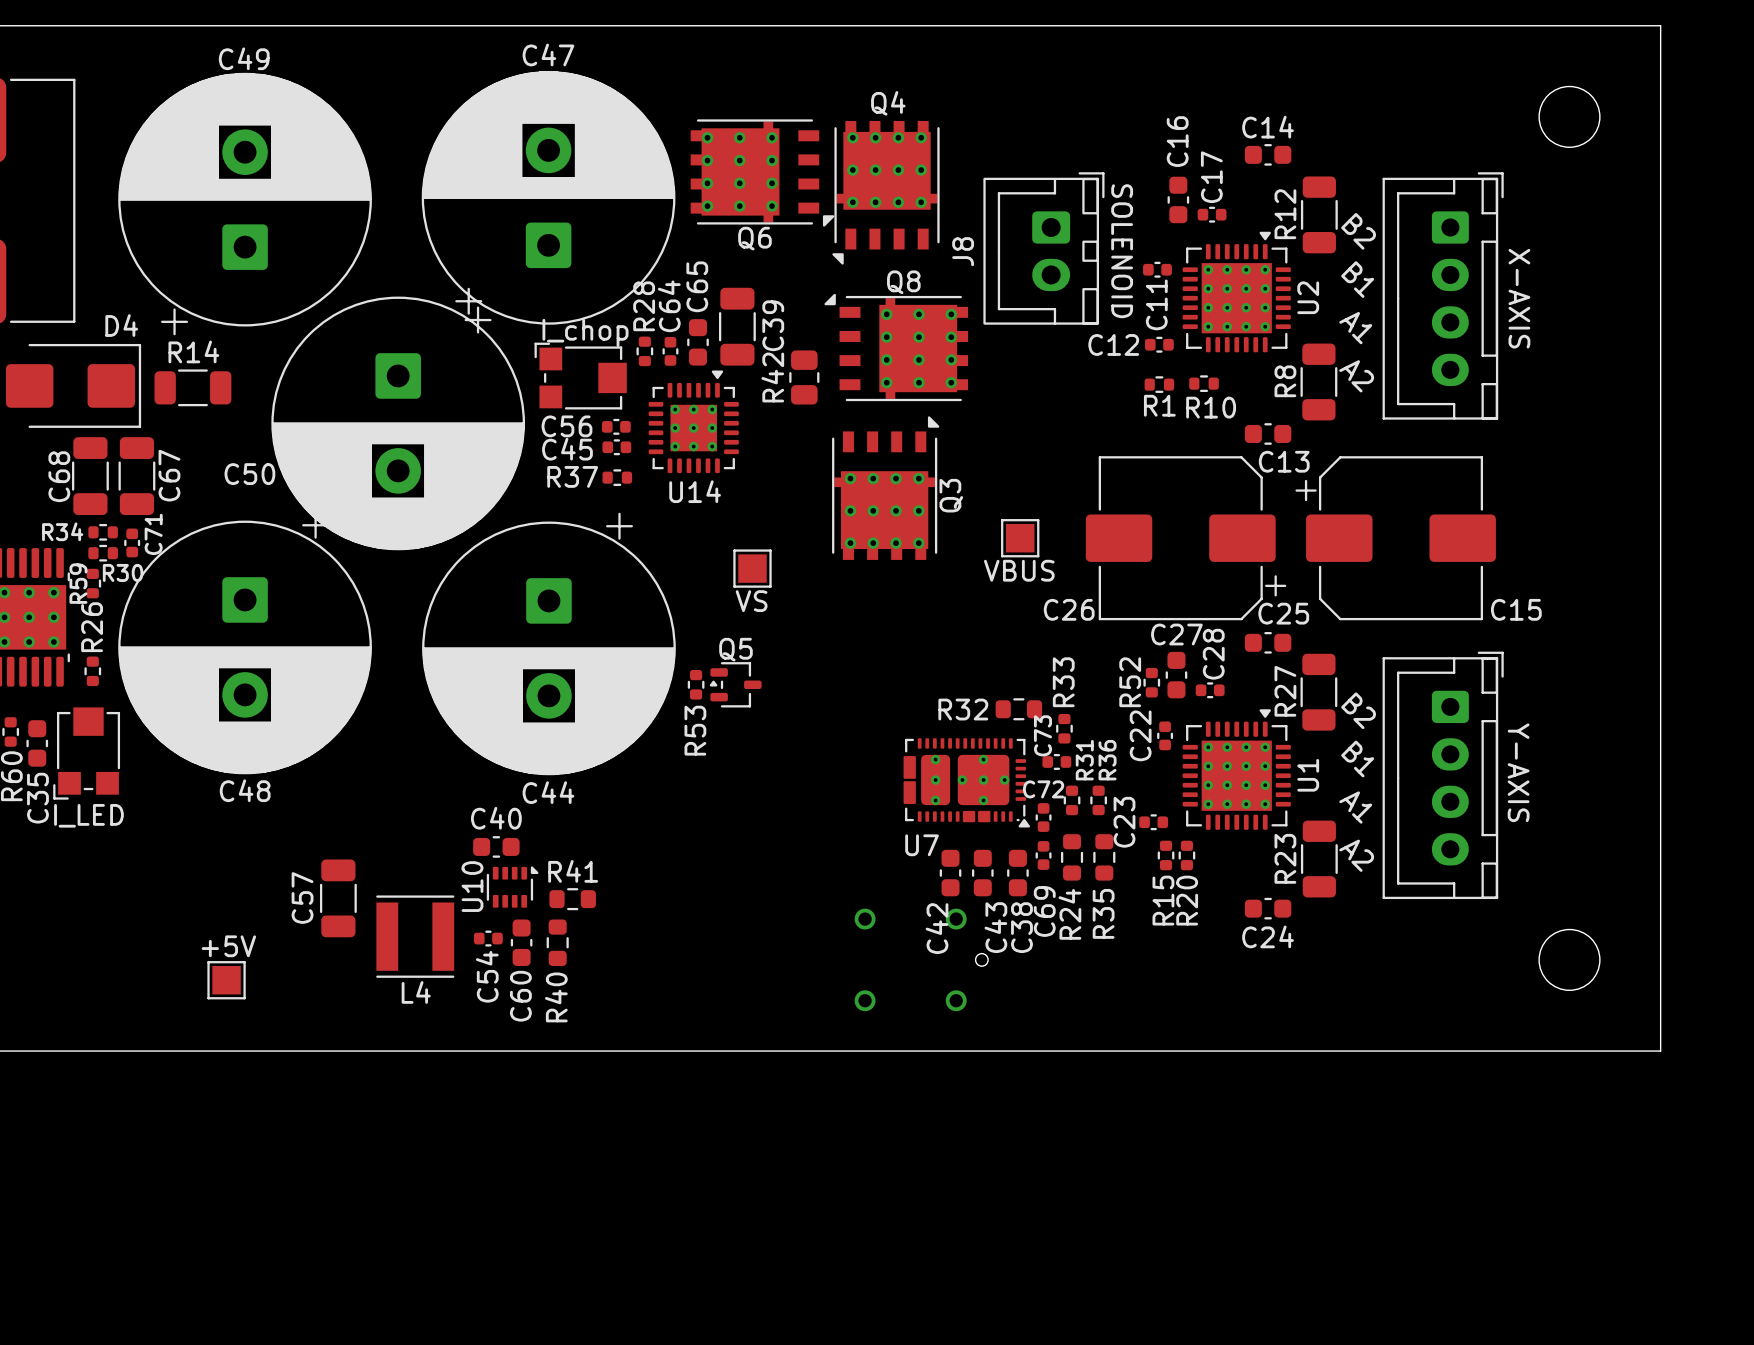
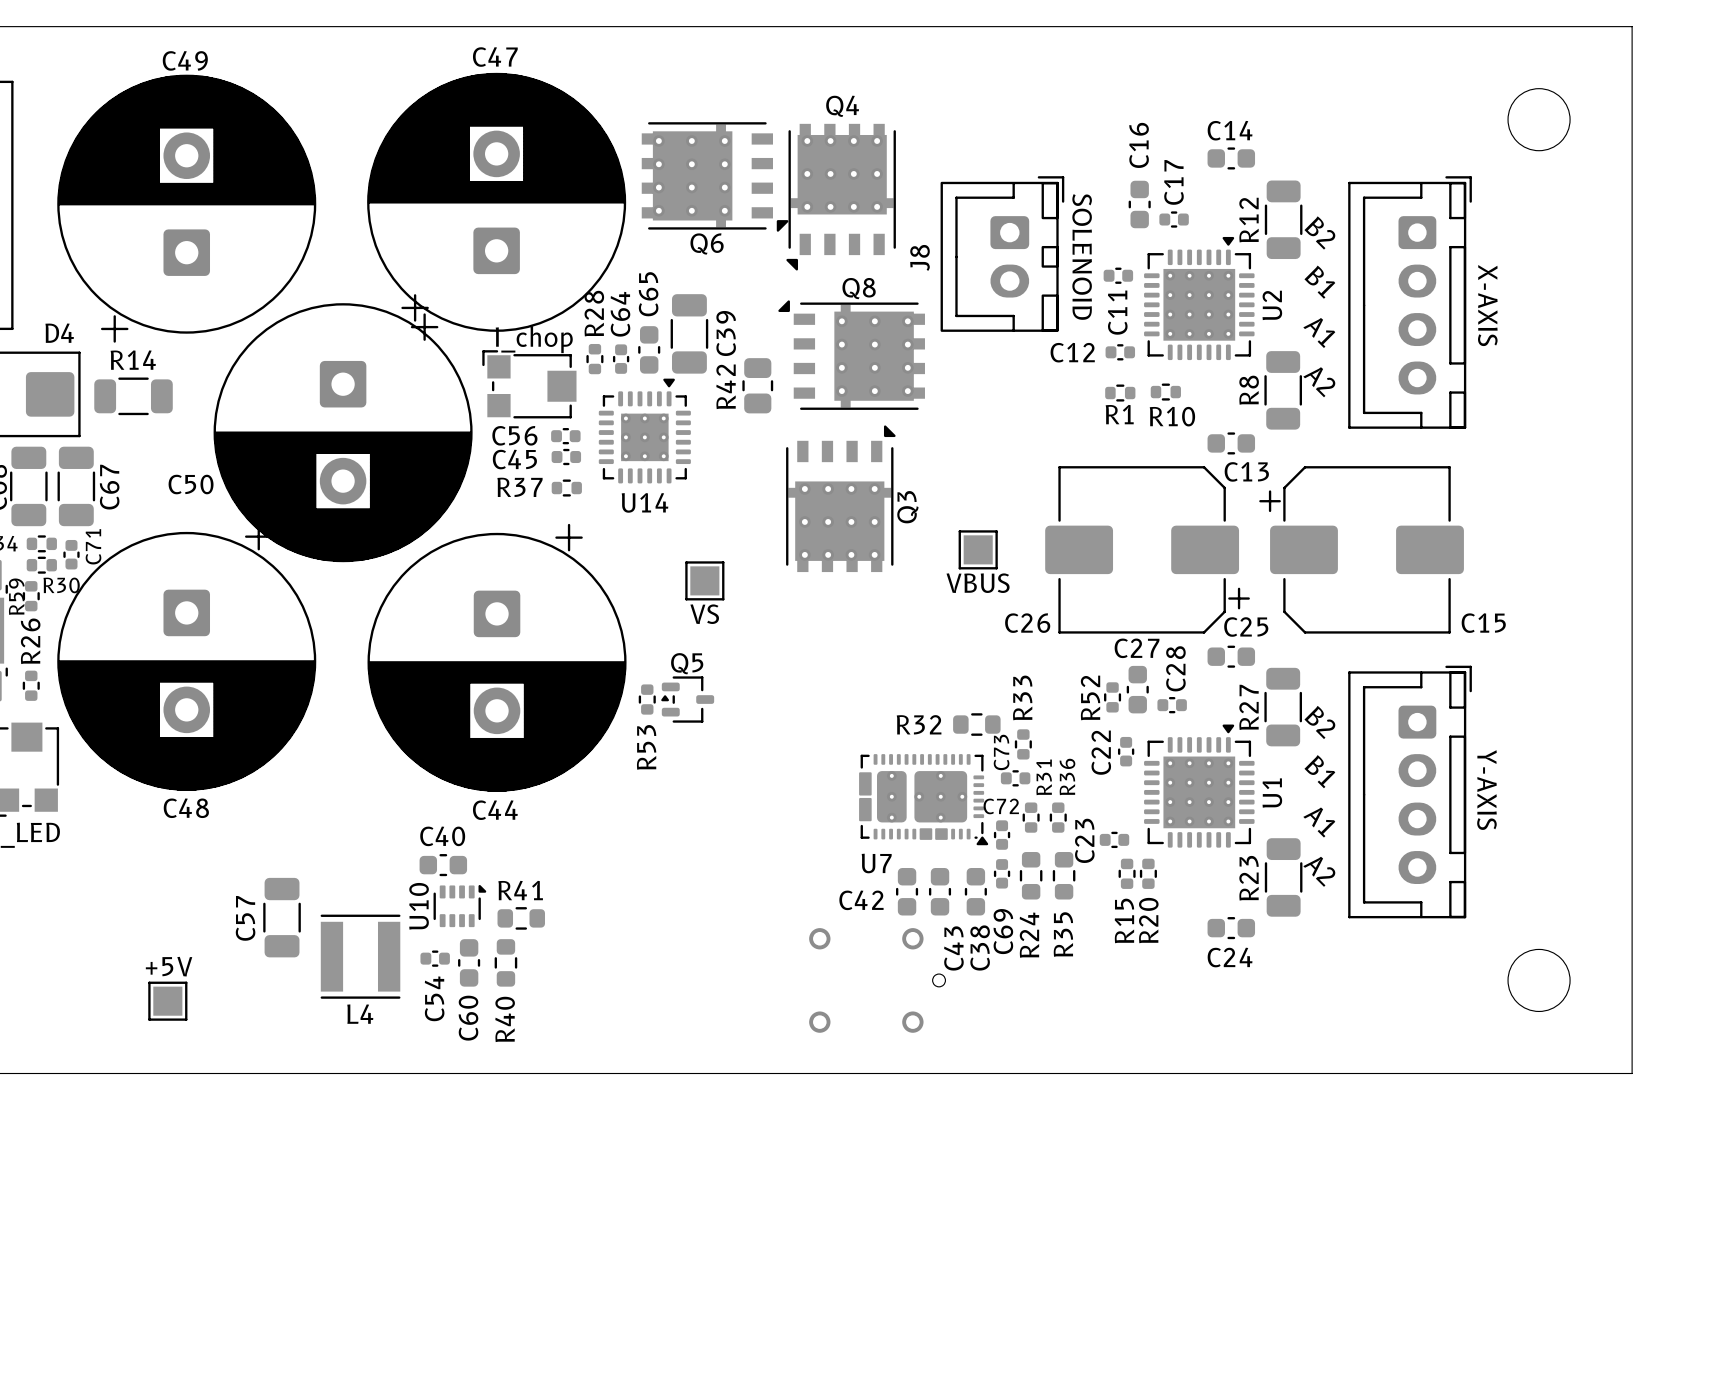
C42 name rotation: 0° (937, 928) -> 90° clockwise (861, 900)

